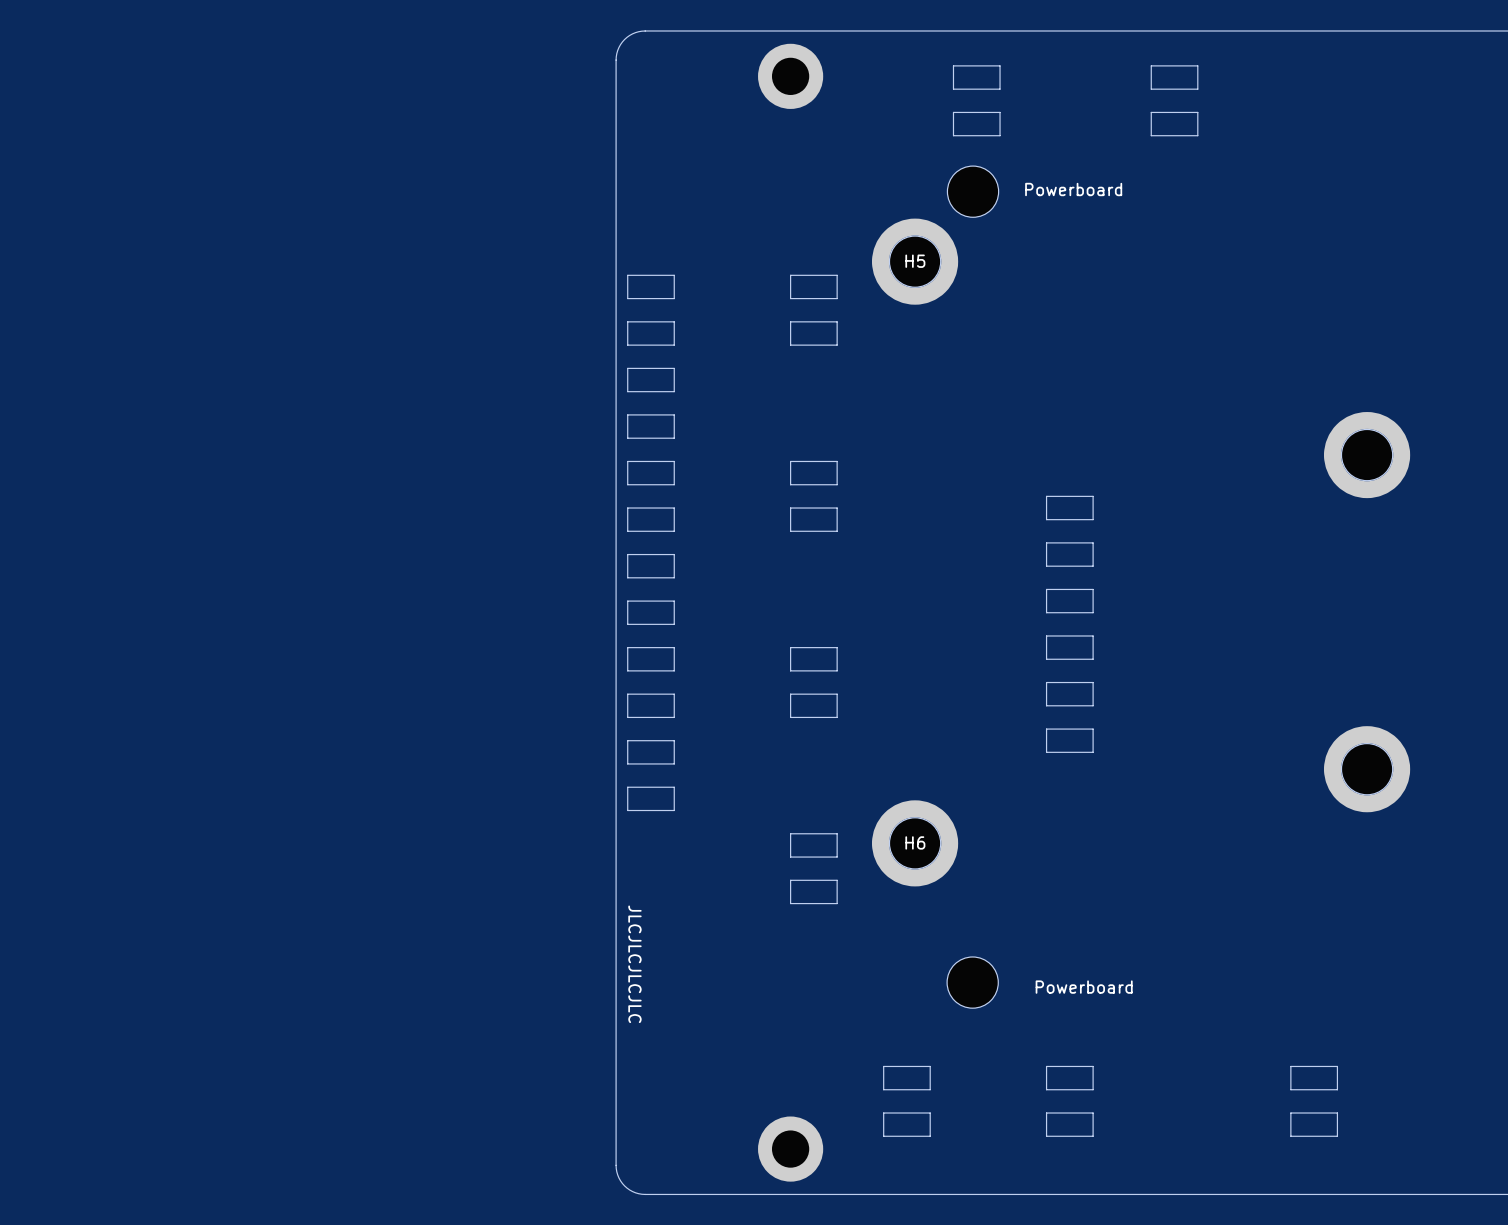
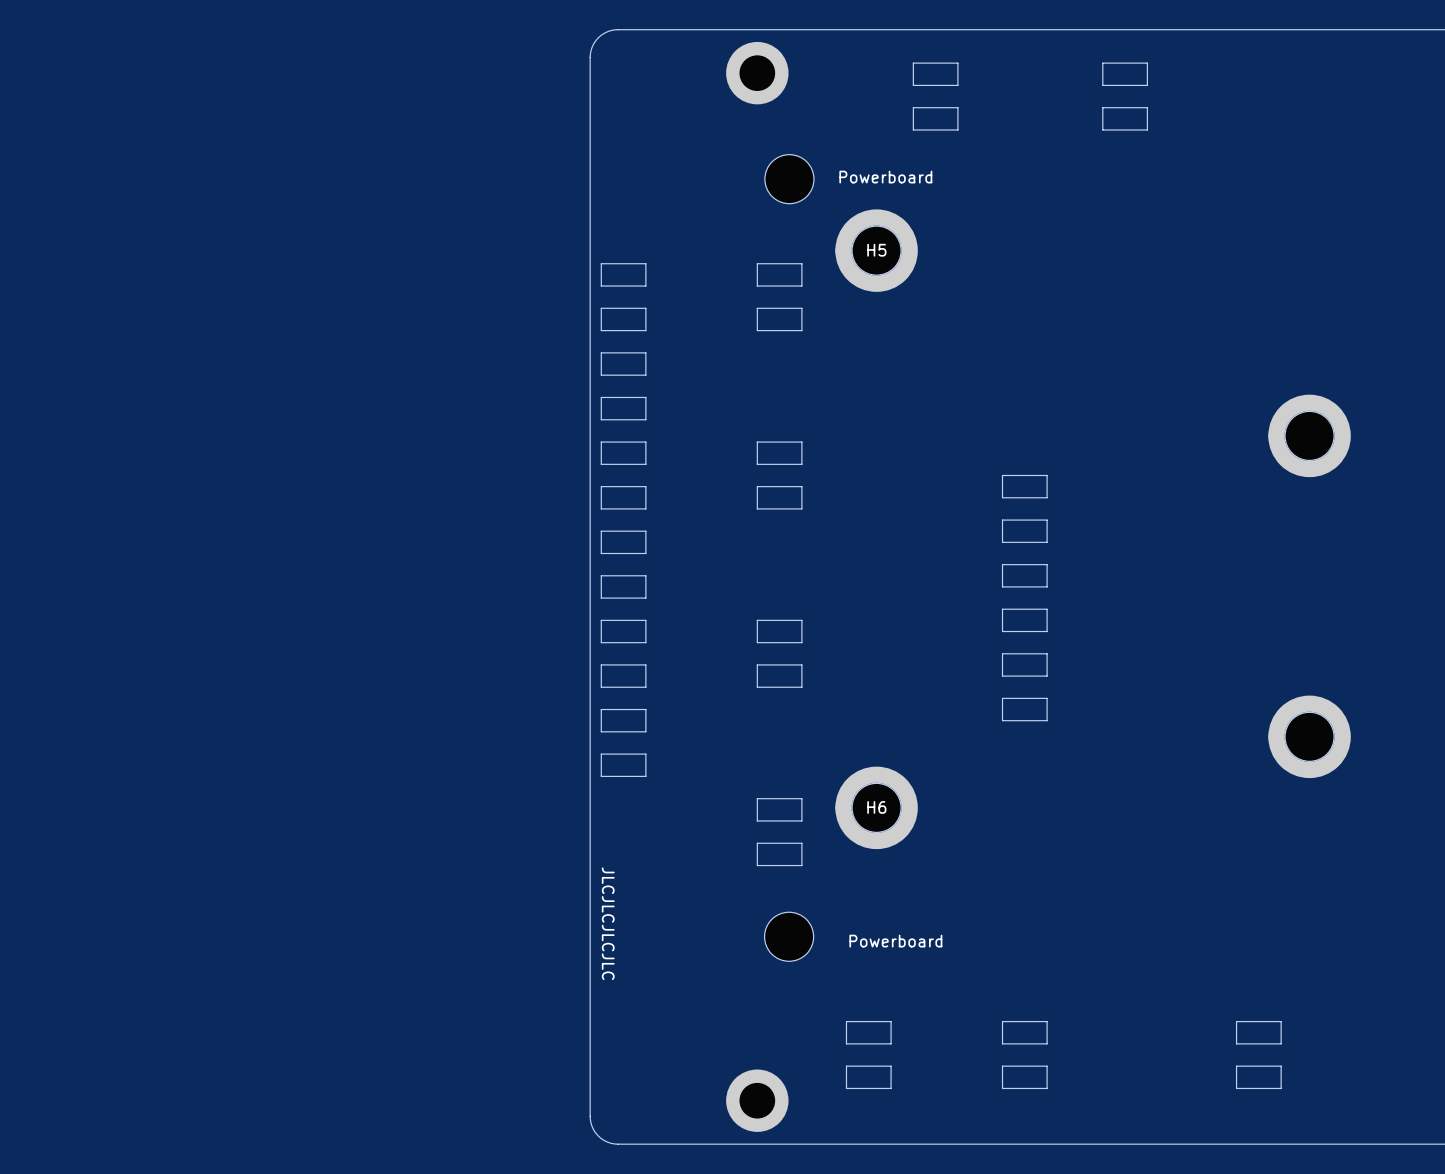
part position: (973, 191) -> (789, 179)
part position: (972, 982) -> (789, 936)
text position: Powerboard (1084, 987) -> Powerboard (895, 941)

